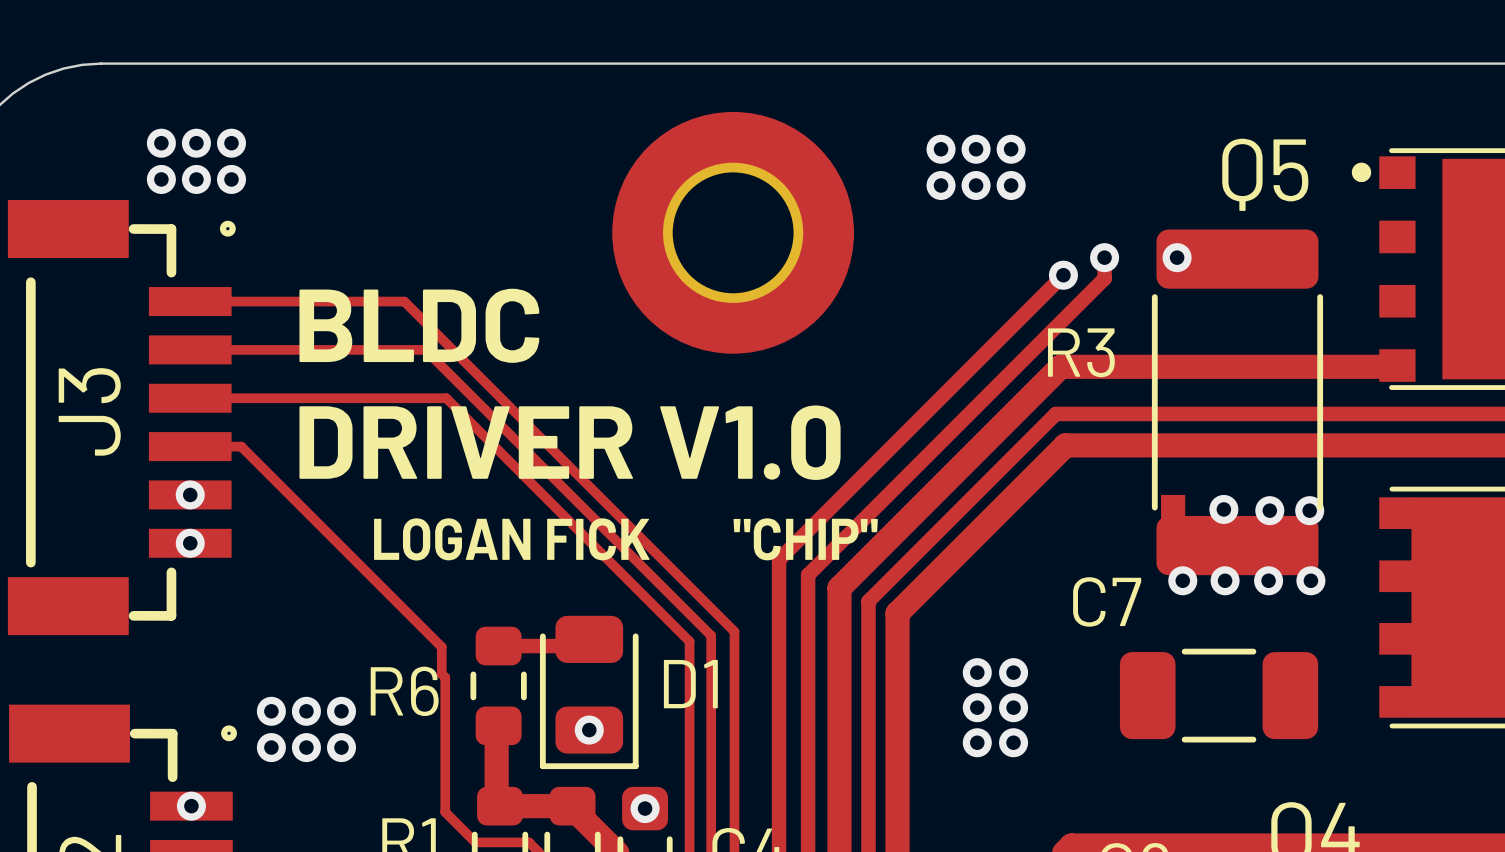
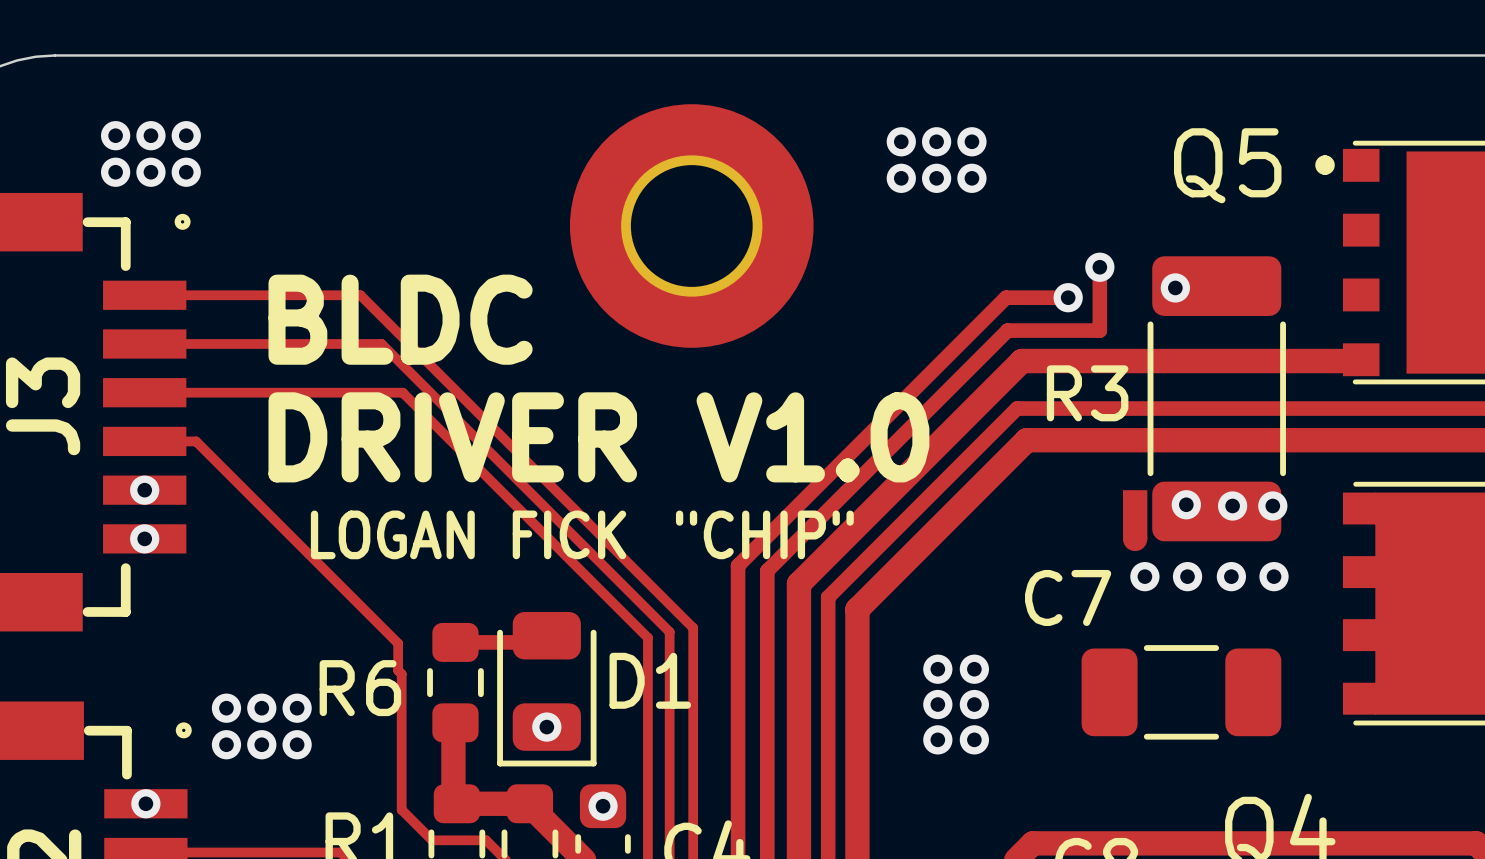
R3 footprint: [1151, 229, 1324, 576] -> [1147, 256, 1286, 542]
via: (1104, 257) -> none
via: (1177, 257) -> none
track: (1104, 270) (1104, 278) (1046, 336) -> (1099, 267) (1099, 330) (1007, 330)
via: none -> (1099, 267)
track: (1063, 275) (779, 559) (779, 569) -> (1068, 297) (1006, 297) (738, 565)
via: (1063, 275) -> none
via: none -> (1175, 287)
via: none -> (1068, 297)
R3 name position: R3 (1081, 352) -> R3 (1087, 393)

